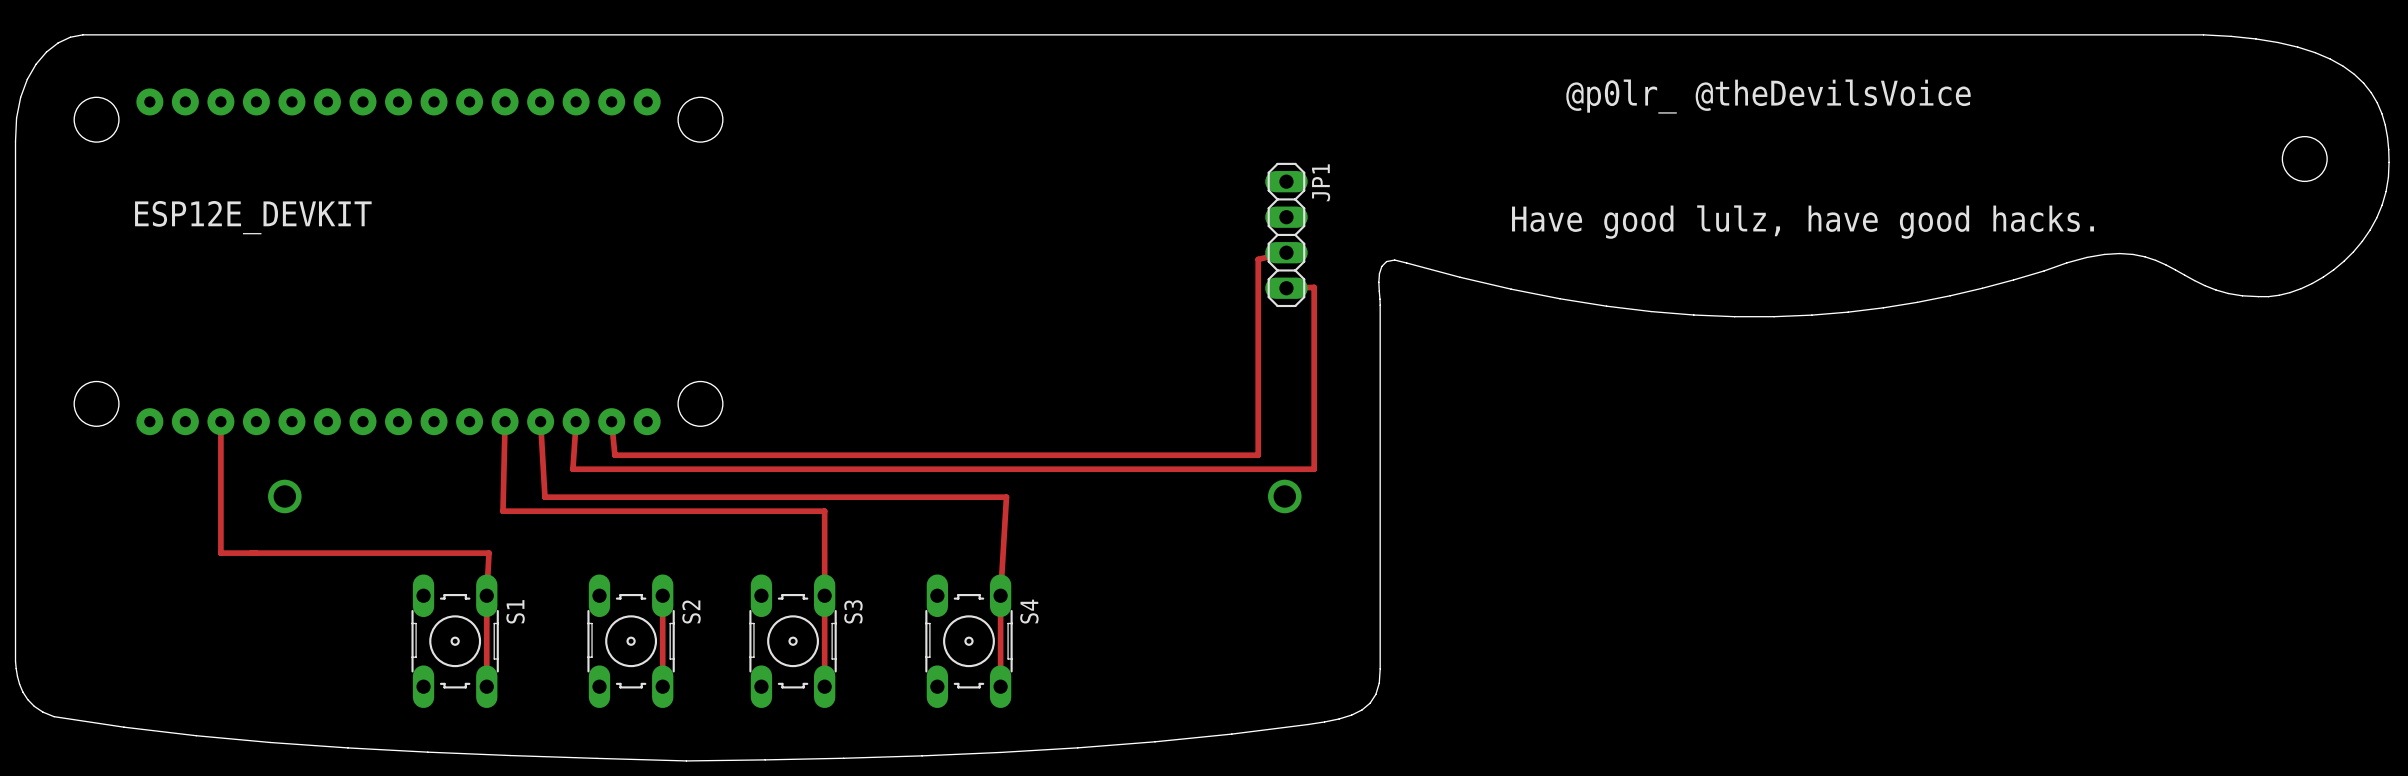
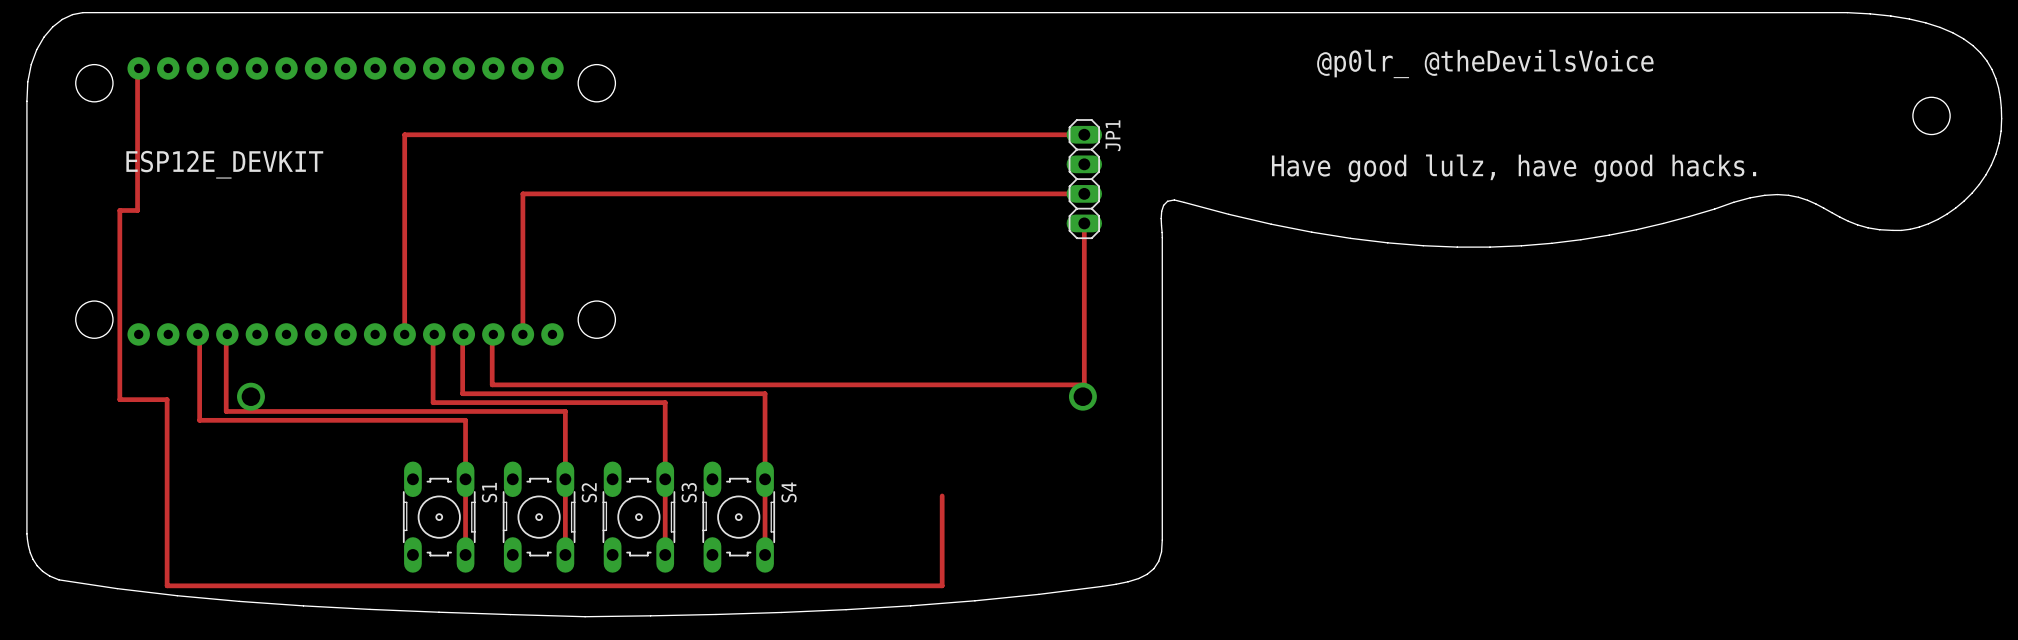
track: none -> (138, 68) (137, 210) (119, 210) (119, 399) (167, 399) (167, 585) (942, 585) (942, 495)
track: none -> (1084, 134) (404, 134) (404, 334)
track: (1286, 252) (1258, 259) (1258, 455) (614, 455) (611, 421) -> (1084, 193) (522, 193) (522, 334)
track: (1286, 288) (1314, 287) (1314, 469) (572, 469) (576, 421) -> (1084, 223) (1084, 384) (492, 384) (493, 334)
track: (220, 421) (220, 553) (489, 553) (486, 595) (486, 686) -> (197, 334) (199, 334) (199, 420) (465, 420) (465, 555) (467, 555)
track: none -> (227, 334) (226, 411) (565, 411) (565, 479)
track: (505, 421) (502, 511) (824, 511) (824, 686) -> (434, 334) (433, 402) (665, 402) (665, 555) (666, 555)
track: (540, 421) (544, 497) (1006, 497) (1000, 595) (1000, 686) -> (463, 334) (462, 393) (765, 393) (765, 555)
S1 position: (455, 641) -> (439, 517)
S3 position: (793, 641) -> (638, 517)
S4 position: (968, 641) -> (738, 517)

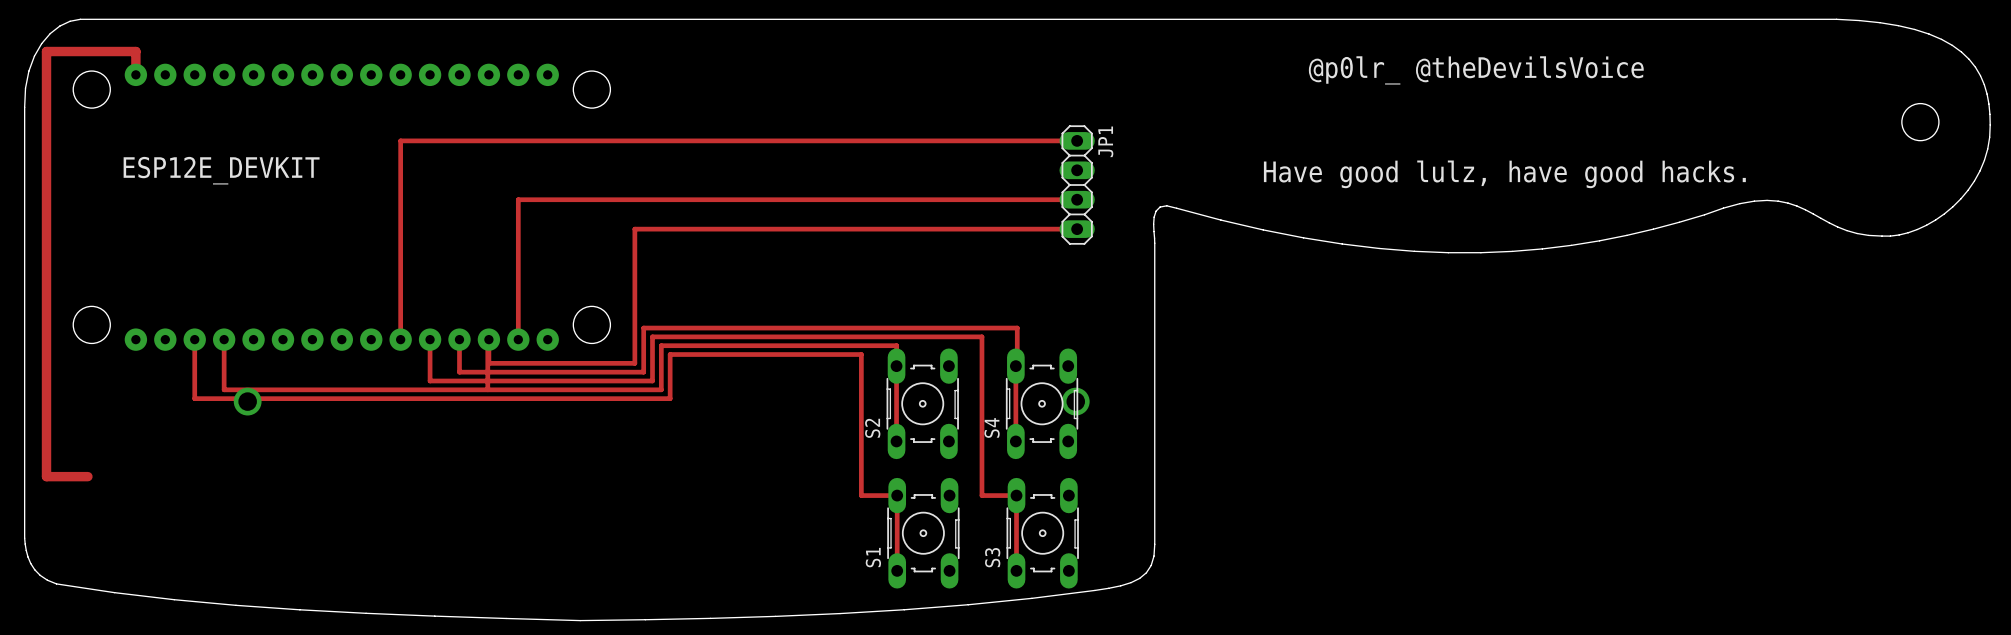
track: (138, 68) (137, 210) (119, 210) (119, 399) (167, 399) (167, 585) (942, 585) (942, 495) -> (135, 74) (135, 51) (46, 51) (46, 476) (87, 476)
track: (1084, 223) (1084, 384) (666, 384) -> (1077, 229) (634, 229) (634, 363) (488, 363) (488, 339)
track: (197, 334) (199, 334) (199, 420) (465, 420) (465, 555) (467, 555) -> (194, 339) (194, 398) (458, 398)
track: (227, 334) (226, 411) (565, 411) (565, 554) -> (224, 339) (224, 389) (487, 389)
track: (434, 334) (433, 402) (665, 402) (665, 555) (666, 555) -> (430, 339) (430, 380) (652, 380) (652, 336) (981, 336) (981, 495) (1016, 495) (1016, 570)
track: (463, 334) (462, 393) -> (459, 339) (459, 372) (643, 372) (643, 328) (1017, 328) (1015, 441)
track: none -> (896, 366) (896, 441)
track: none -> (896, 366) (896, 345) (661, 345) (661, 389)
track: (675, 393) (765, 393) (765, 555) -> (670, 398) (670, 354) (861, 354) (861, 495) (897, 495) (897, 570)
S1 rotation: 0° (439, 517) -> 180° (923, 533)
S1 position: (439, 517) -> (923, 533)
S2 rotation: 0° (539, 517) -> 180° (922, 403)
S2 position: (539, 517) -> (922, 403)
S3 rotation: 0° (638, 517) -> 180° (1042, 533)
S3 position: (638, 517) -> (1042, 533)
S4 rotation: 0° (738, 517) -> 180° (1042, 403)
S4 position: (738, 517) -> (1042, 403)

